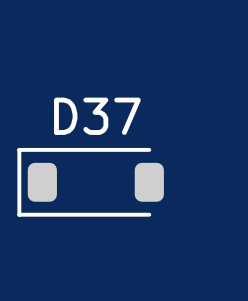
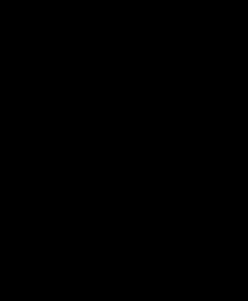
D37: (90, 182) -> none

